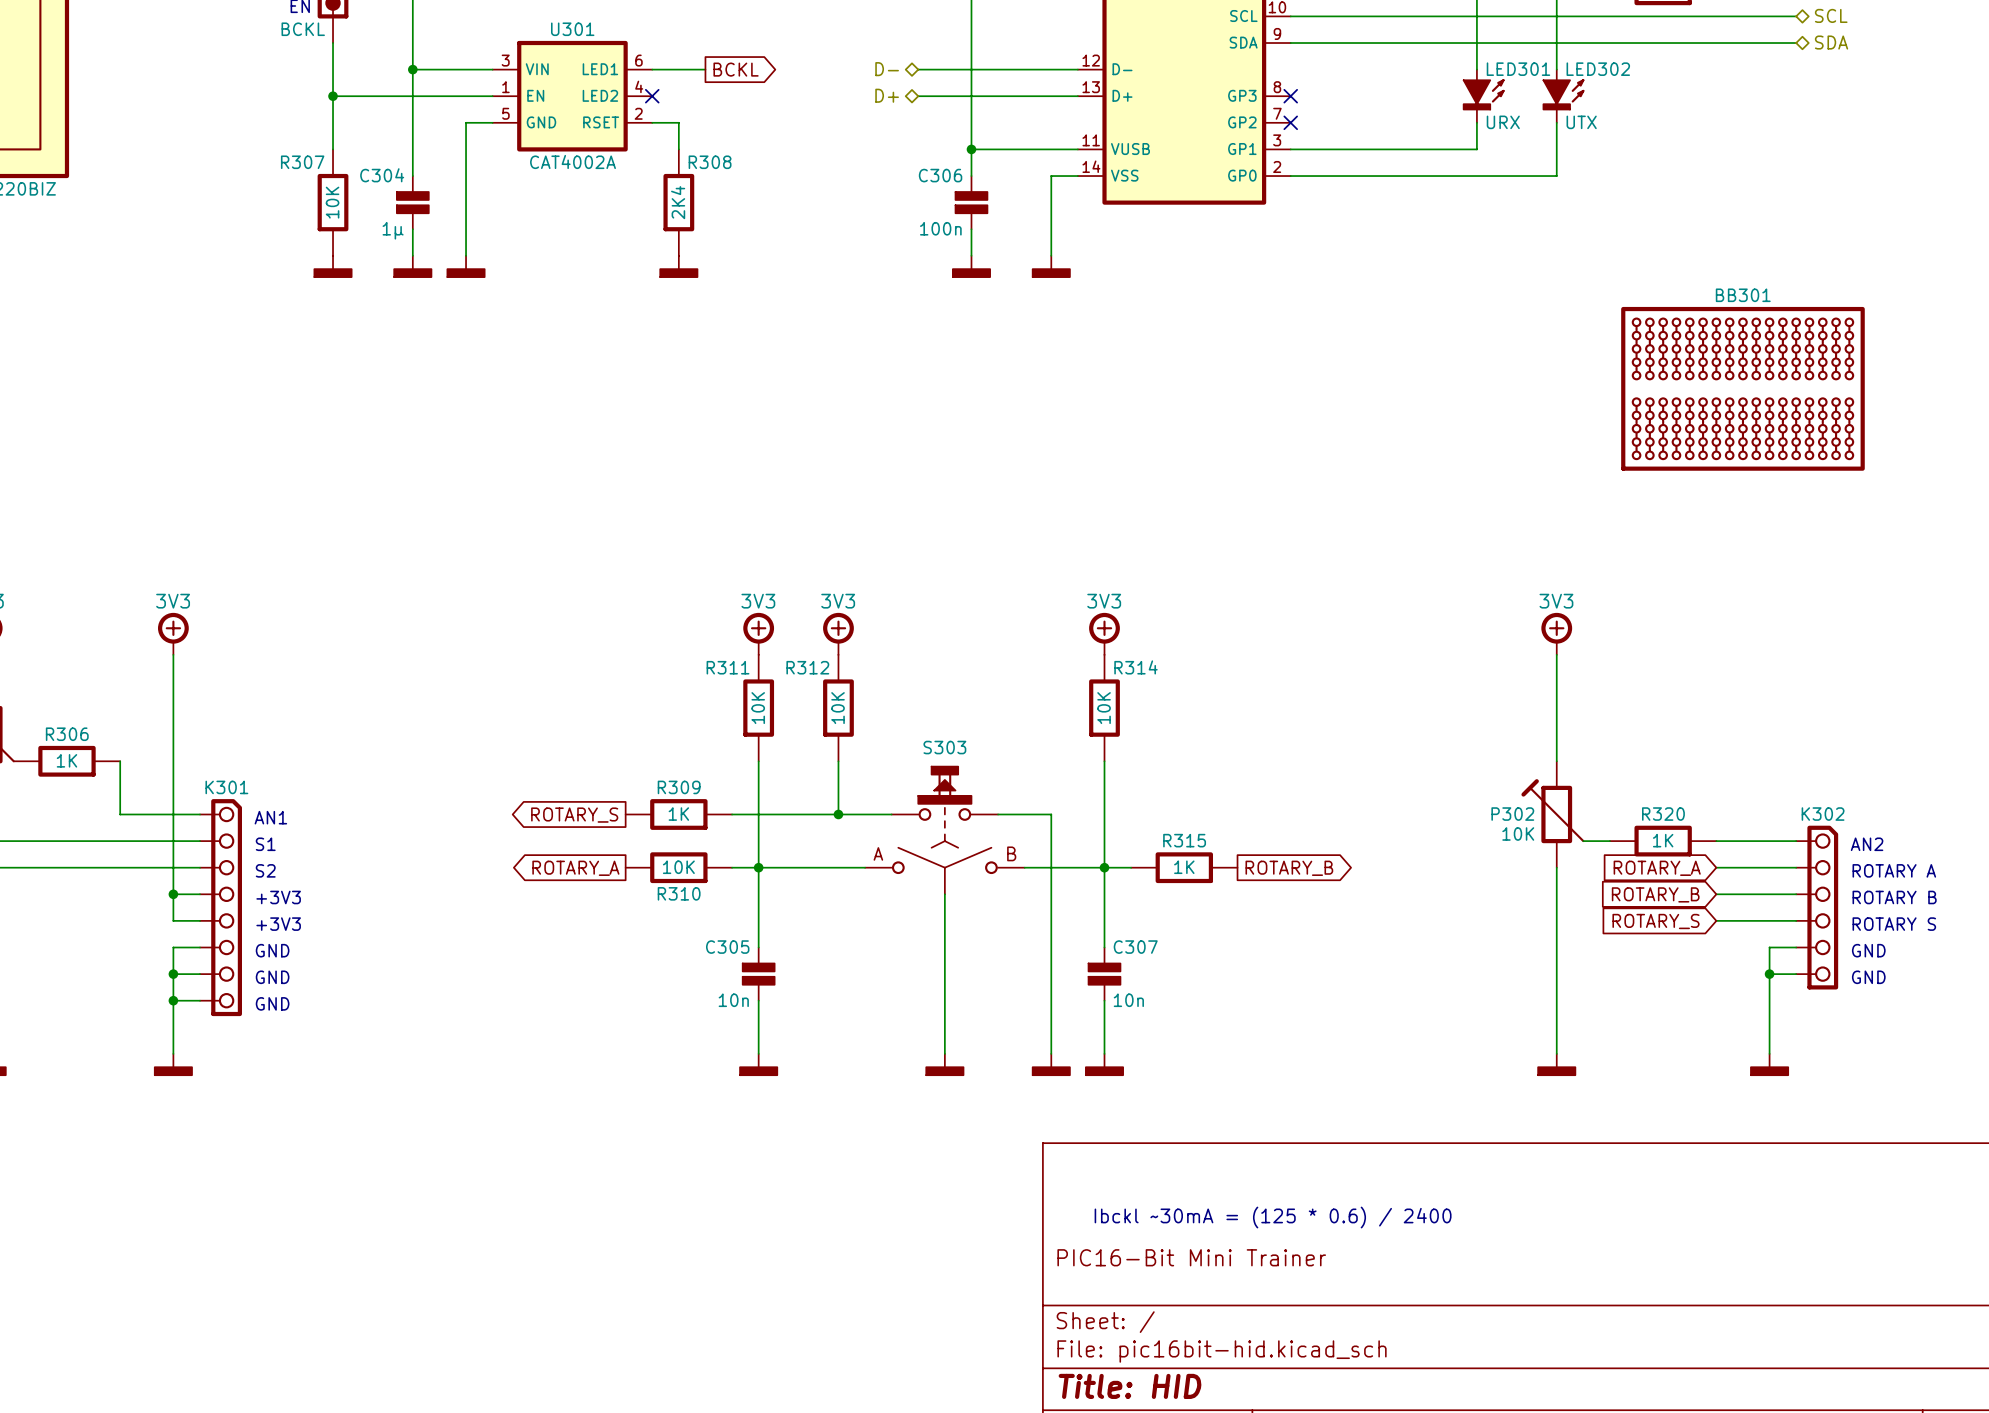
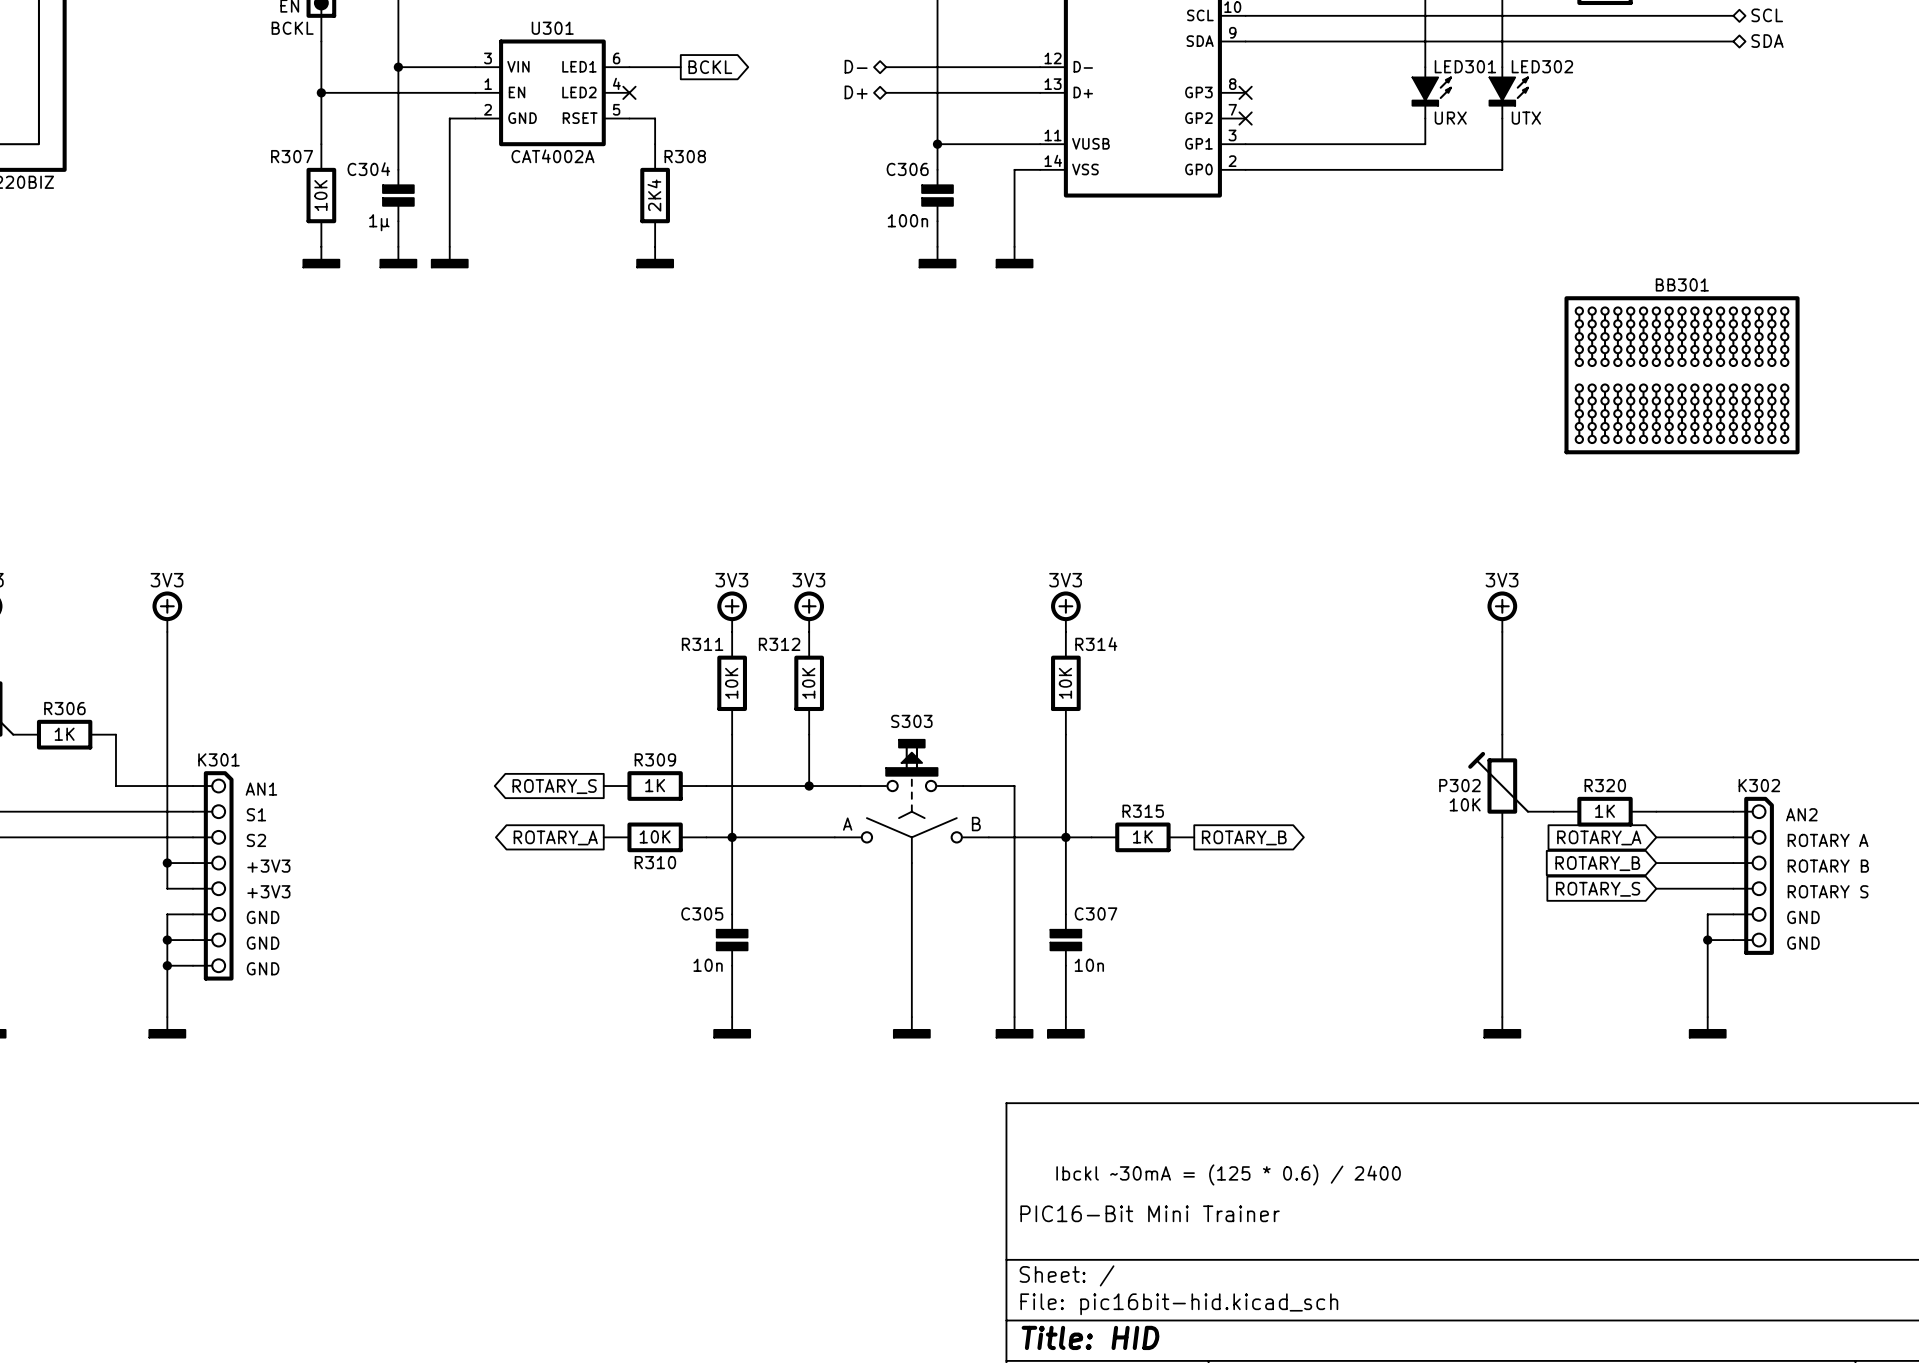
U301 pin number: 5 (505, 113) -> 2 (488, 109)
U301 pin number: 2 (638, 113) -> 5 (616, 109)

